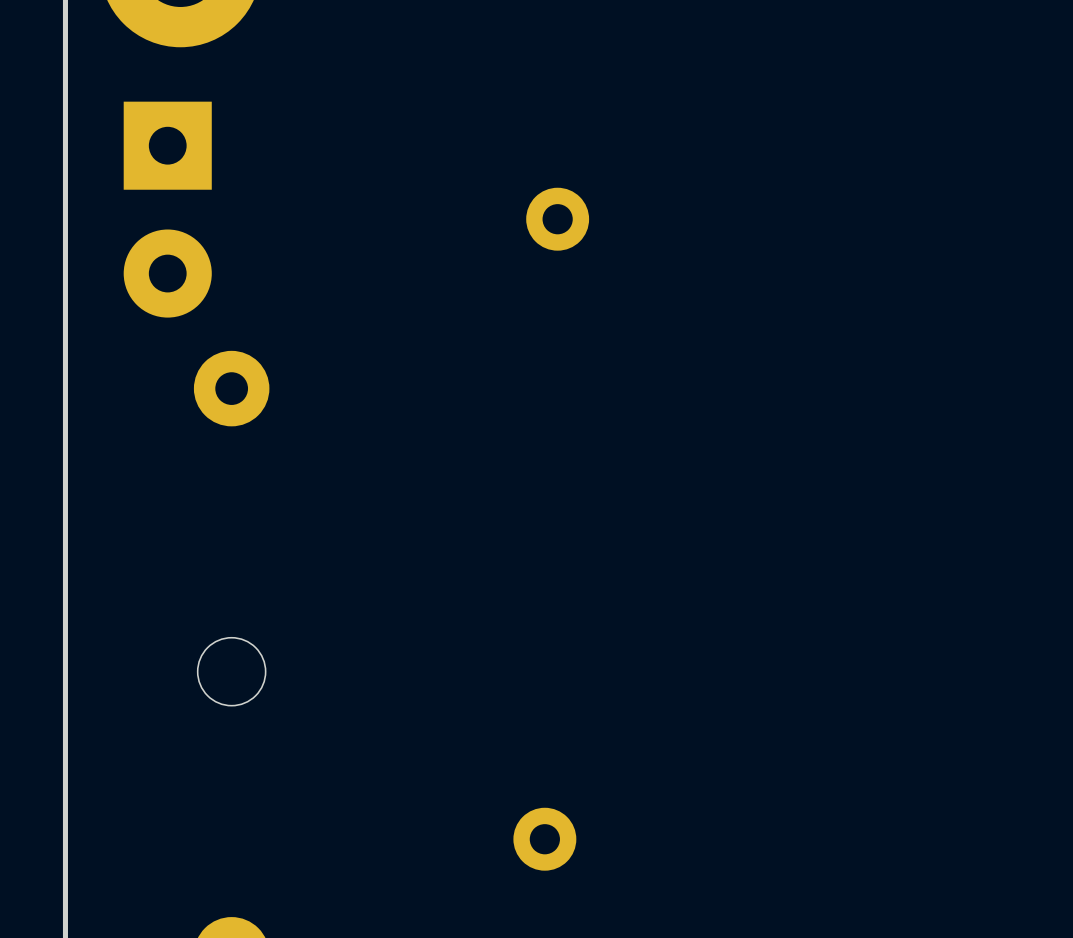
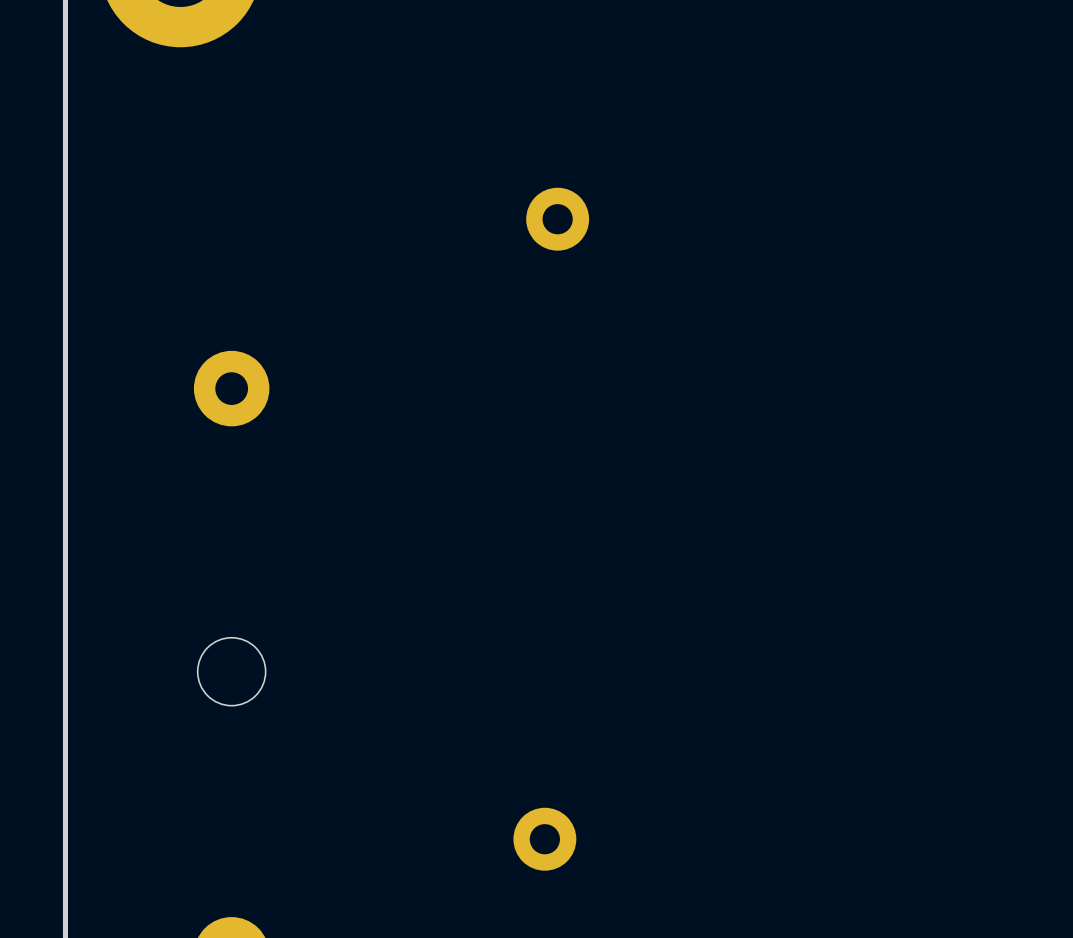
part: (167, 209) -> none

